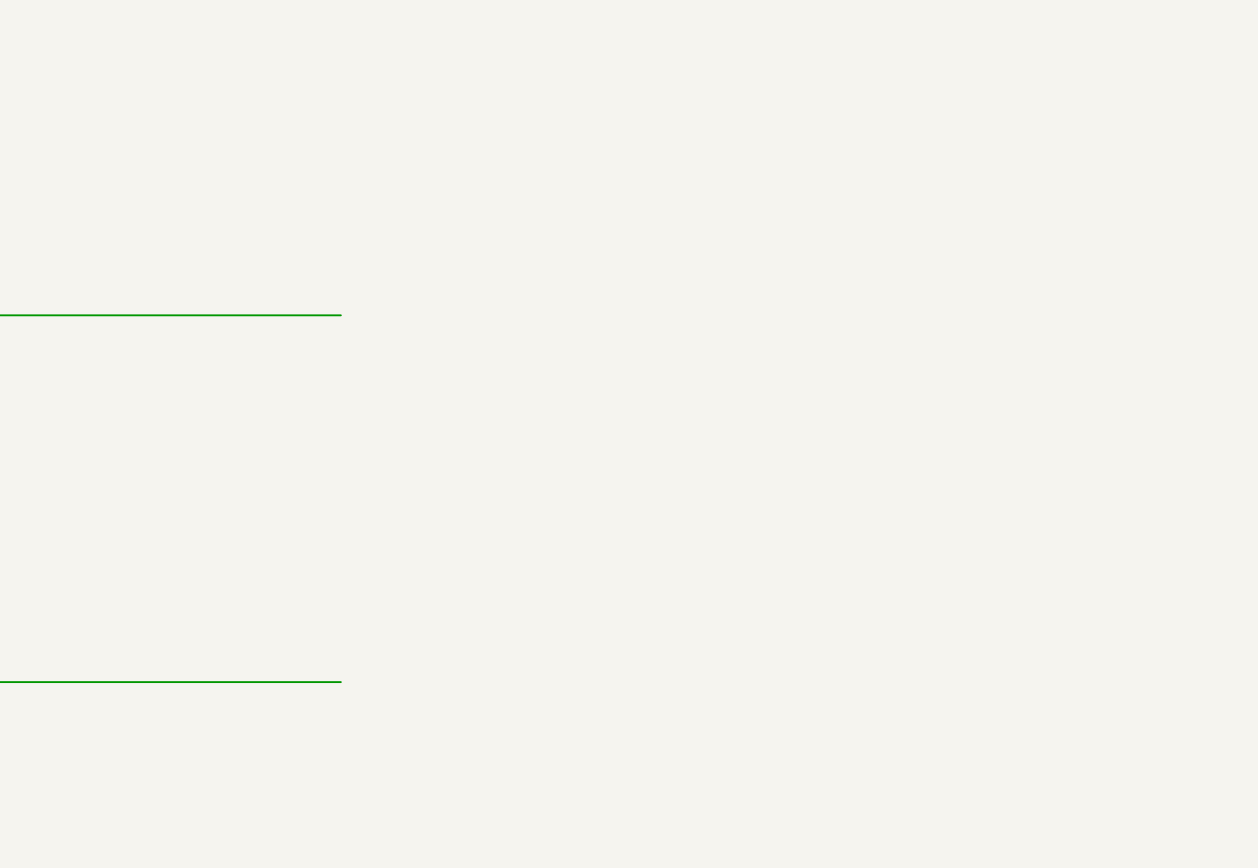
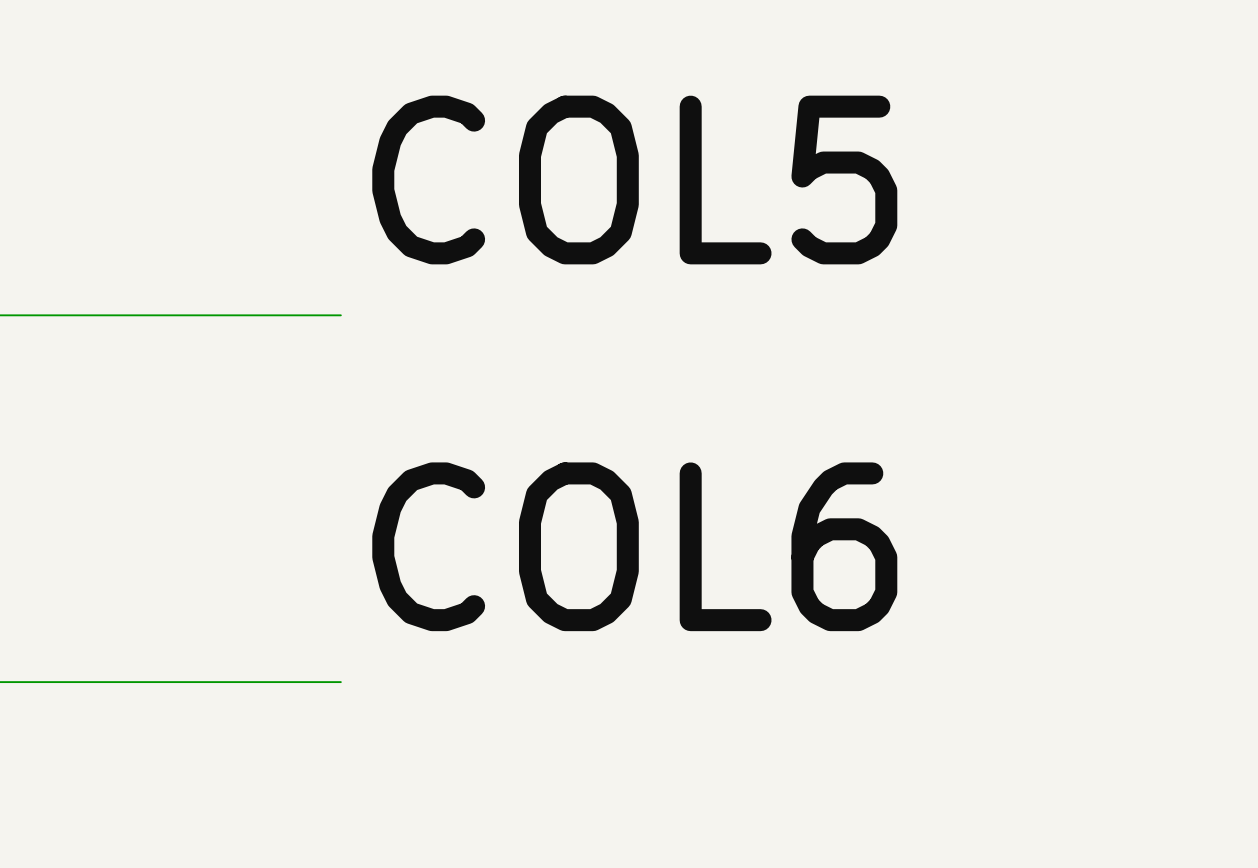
label: none -> COL5 (634, 180)
label: none -> COL6 (634, 546)

